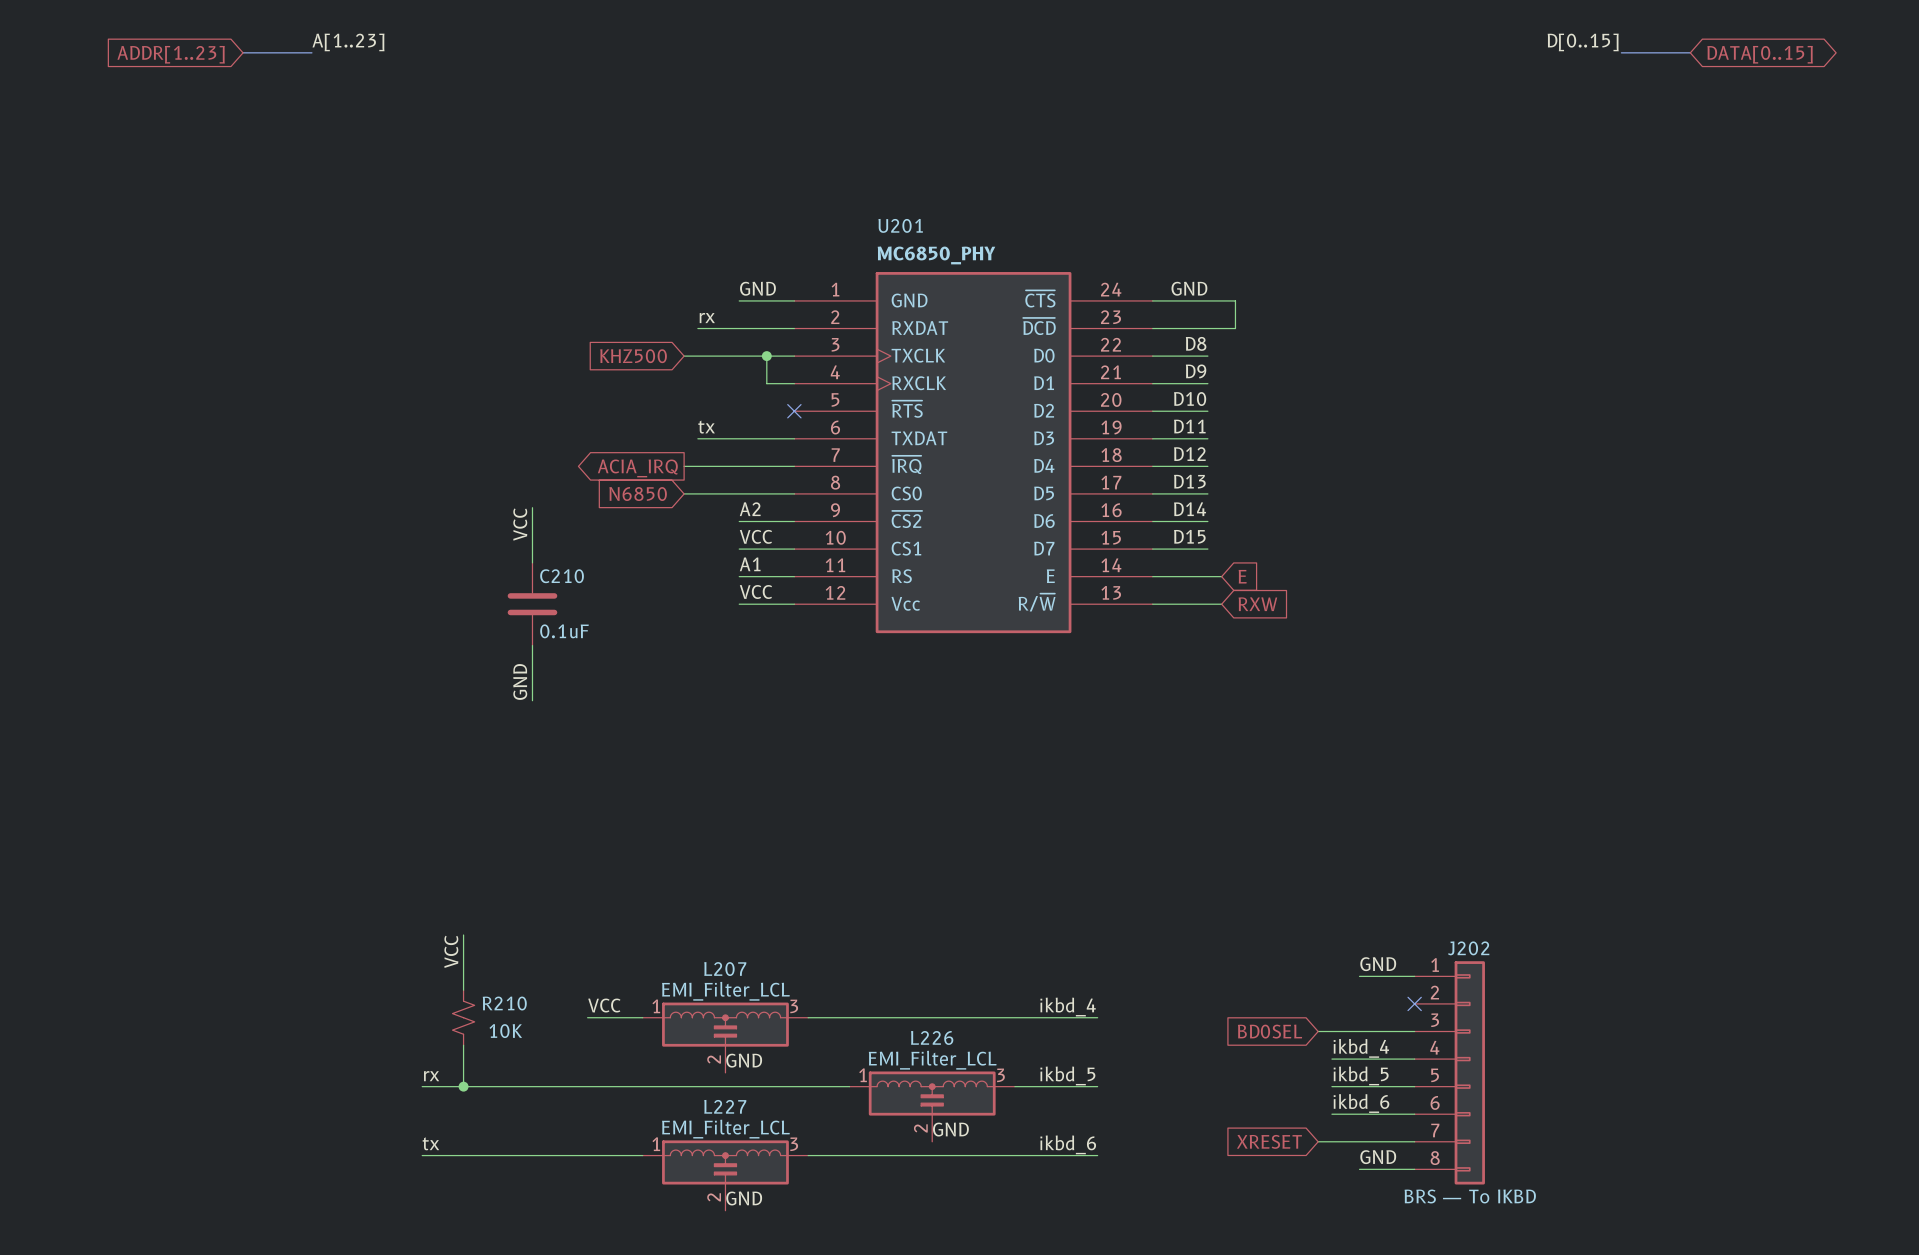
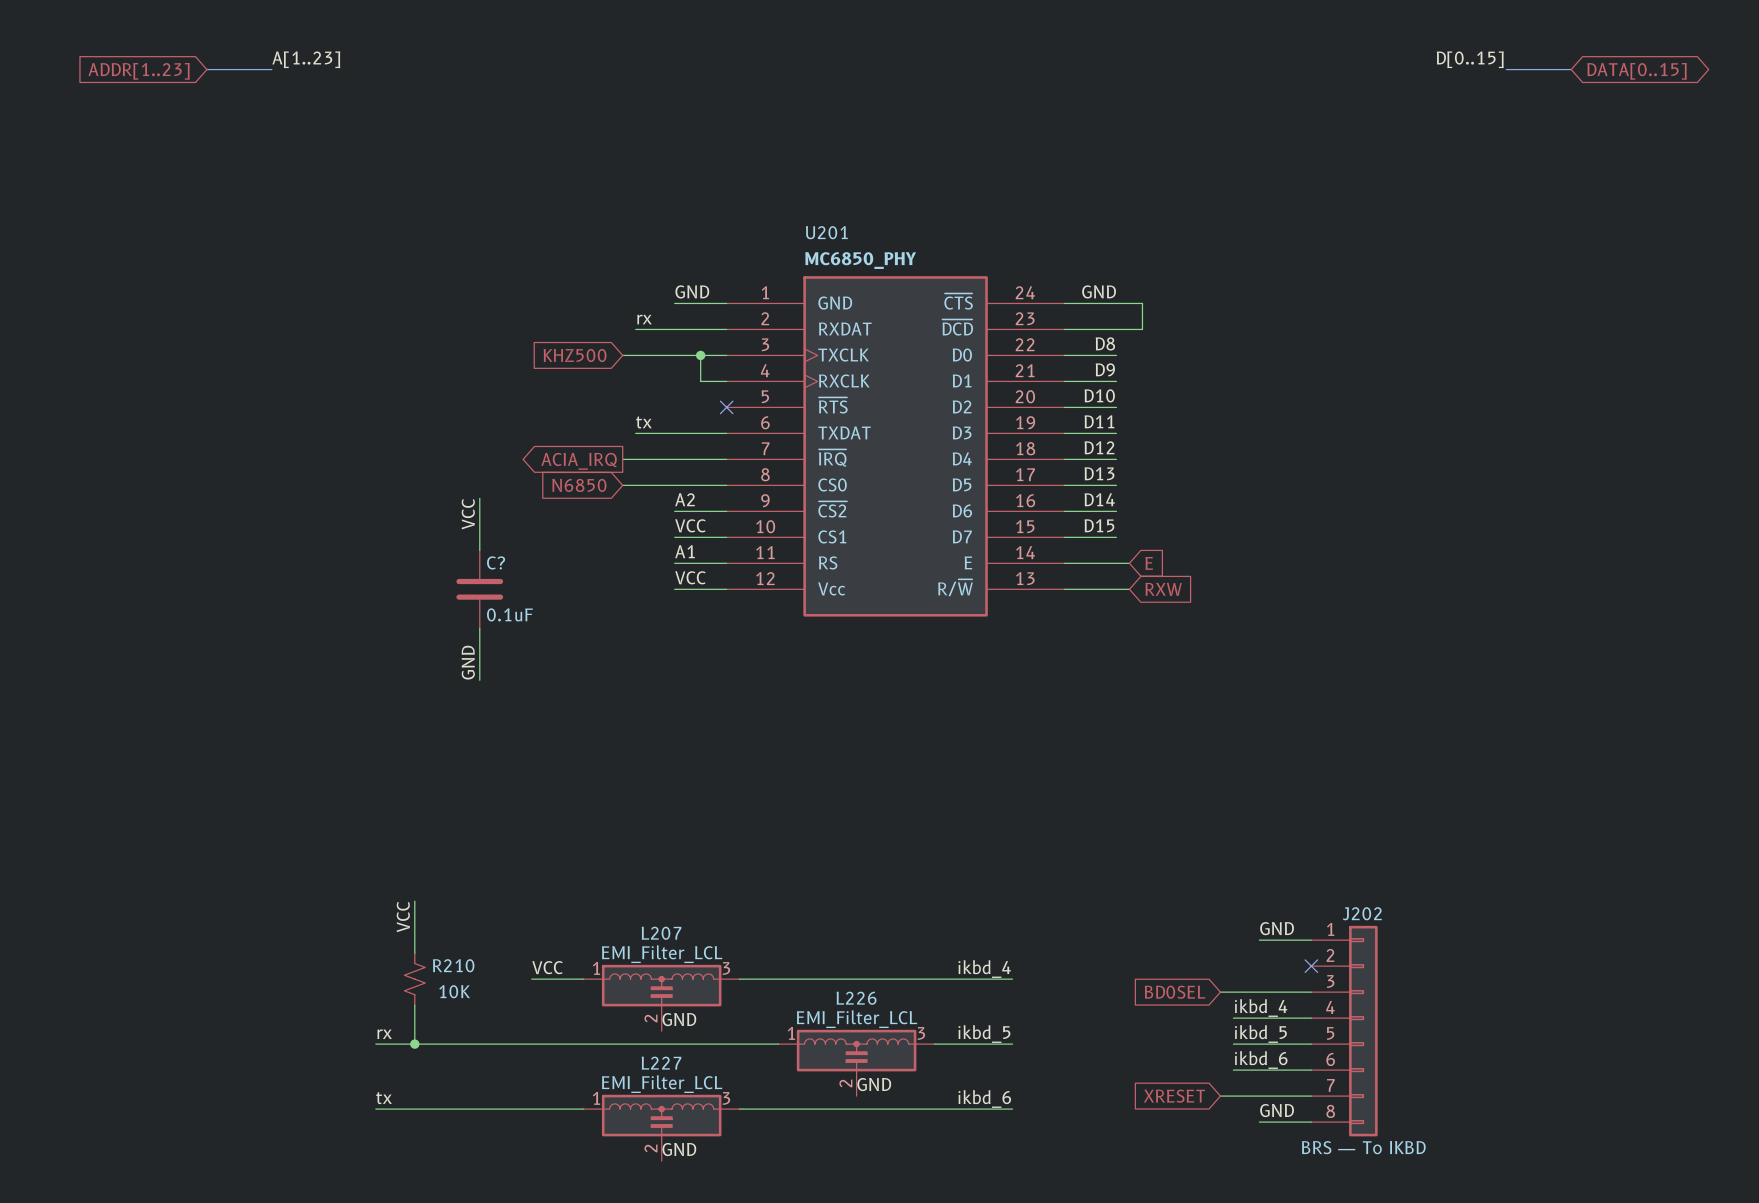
C210 name: C210 (562, 576) -> C? (496, 562)

